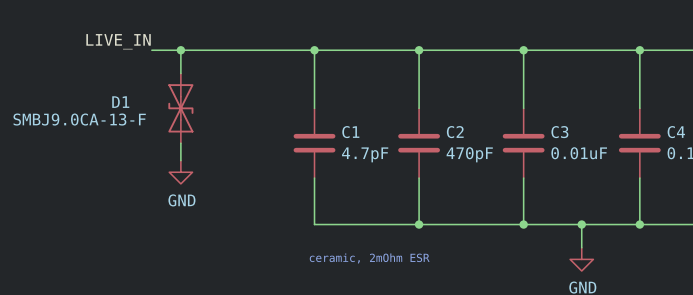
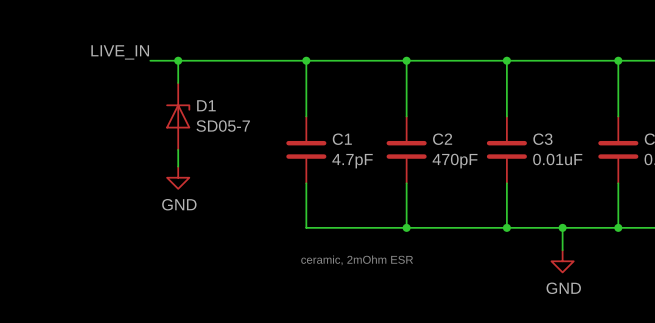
D1 symbol: [168, 73, 194, 144] -> [166, 83, 191, 150]
D1 name position: D1 (120, 102) -> D1 (206, 105)
D1 value: SMBJ9.0CA-13-F (79, 119) -> SD05-7 (223, 126)

